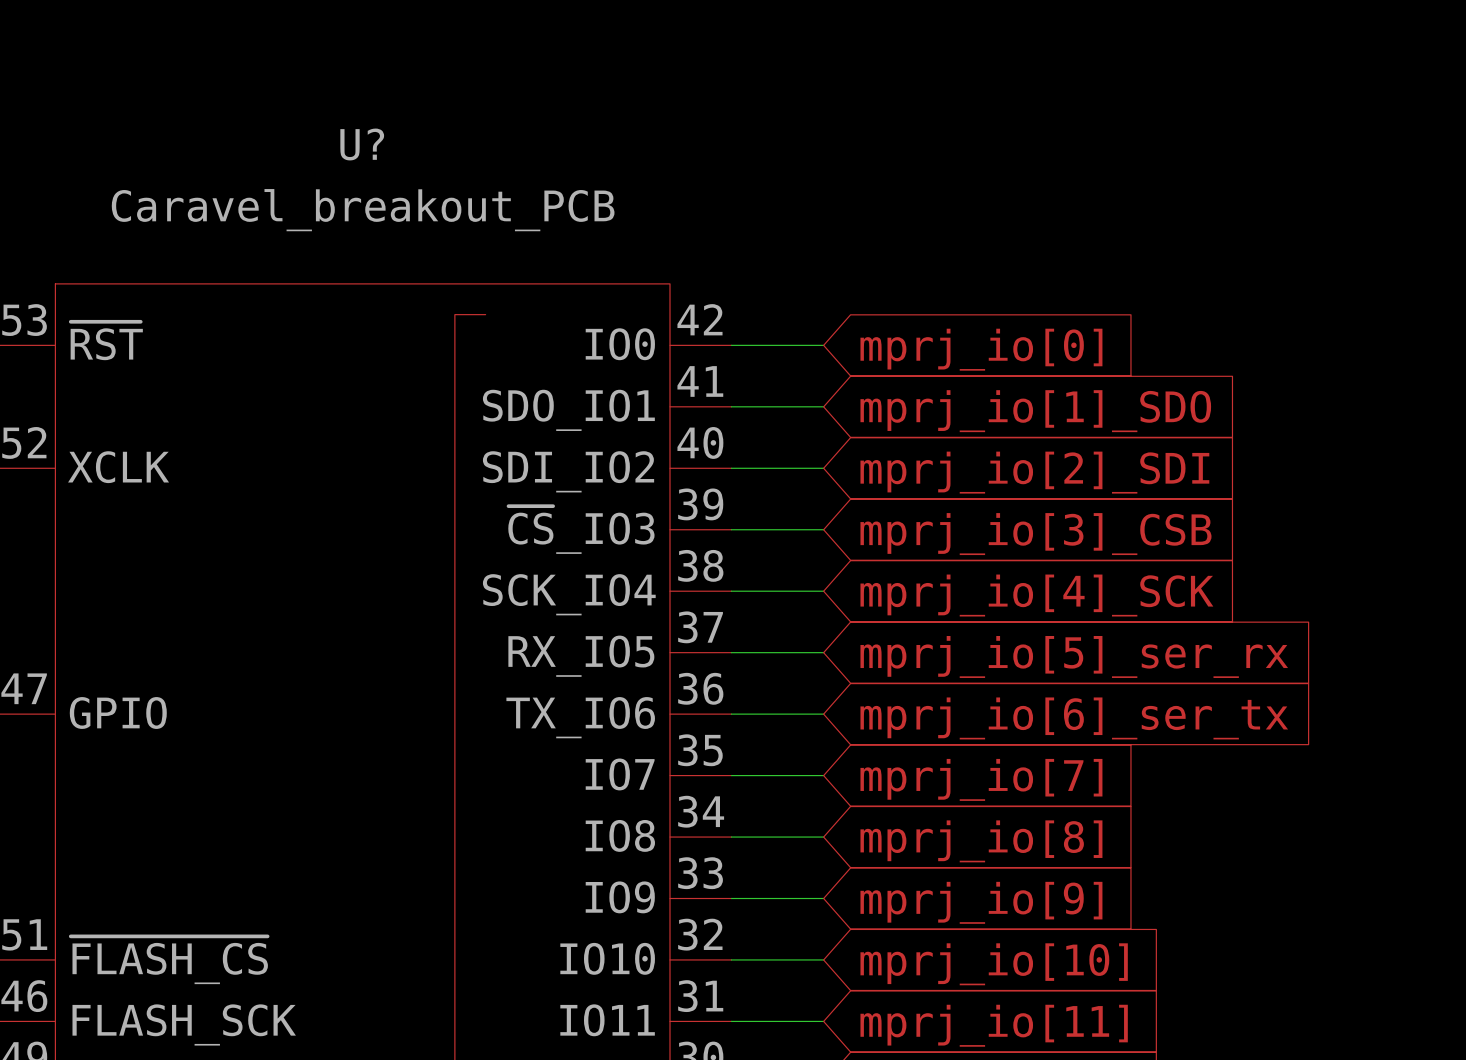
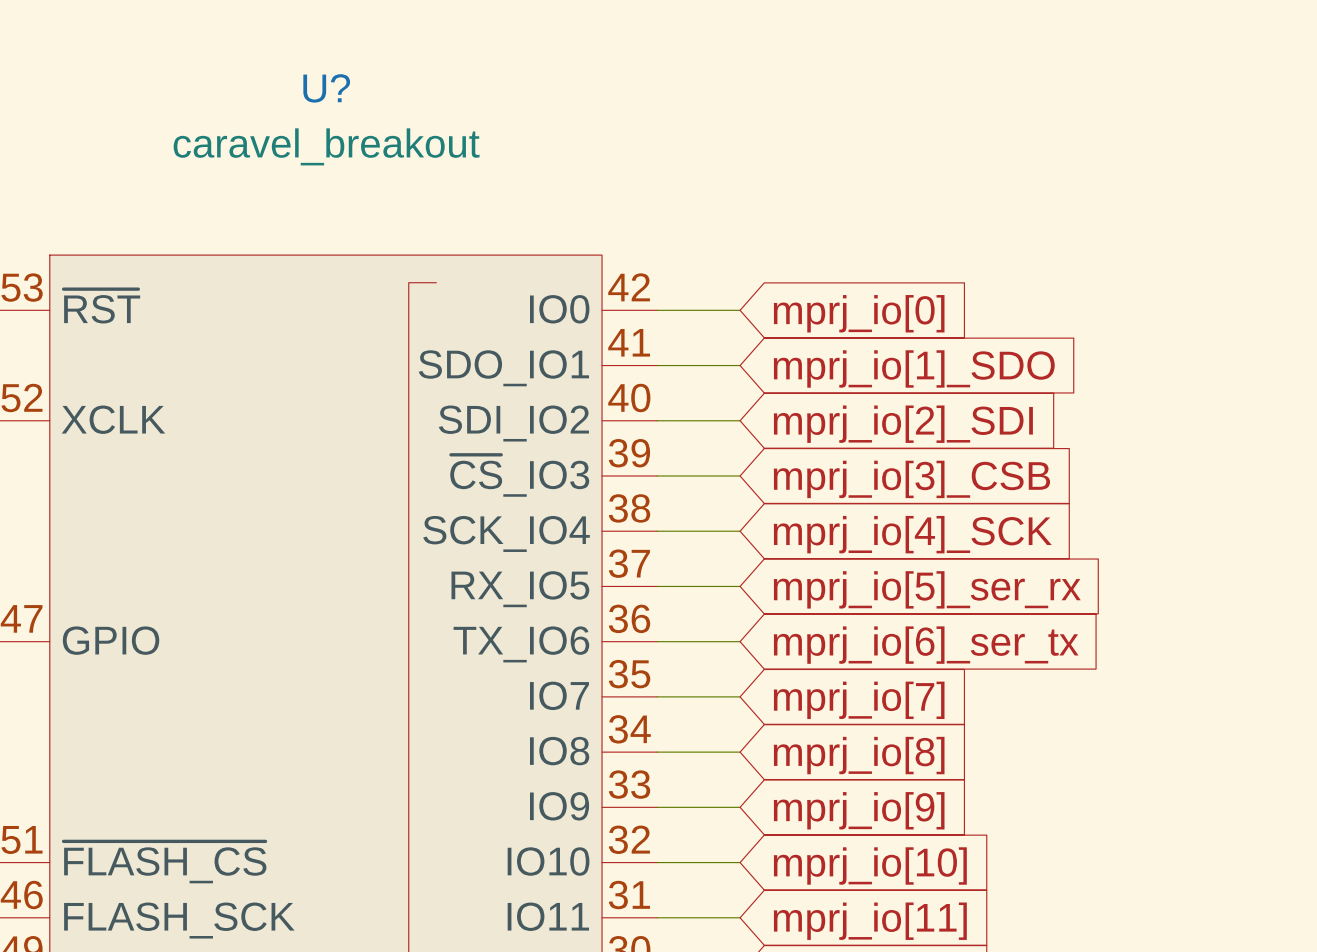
U? name position: U? (362, 144) -> U? (326, 88)
U? value: Caravel_breakout_PCB (363, 210) -> caravel_breakout (326, 146)

